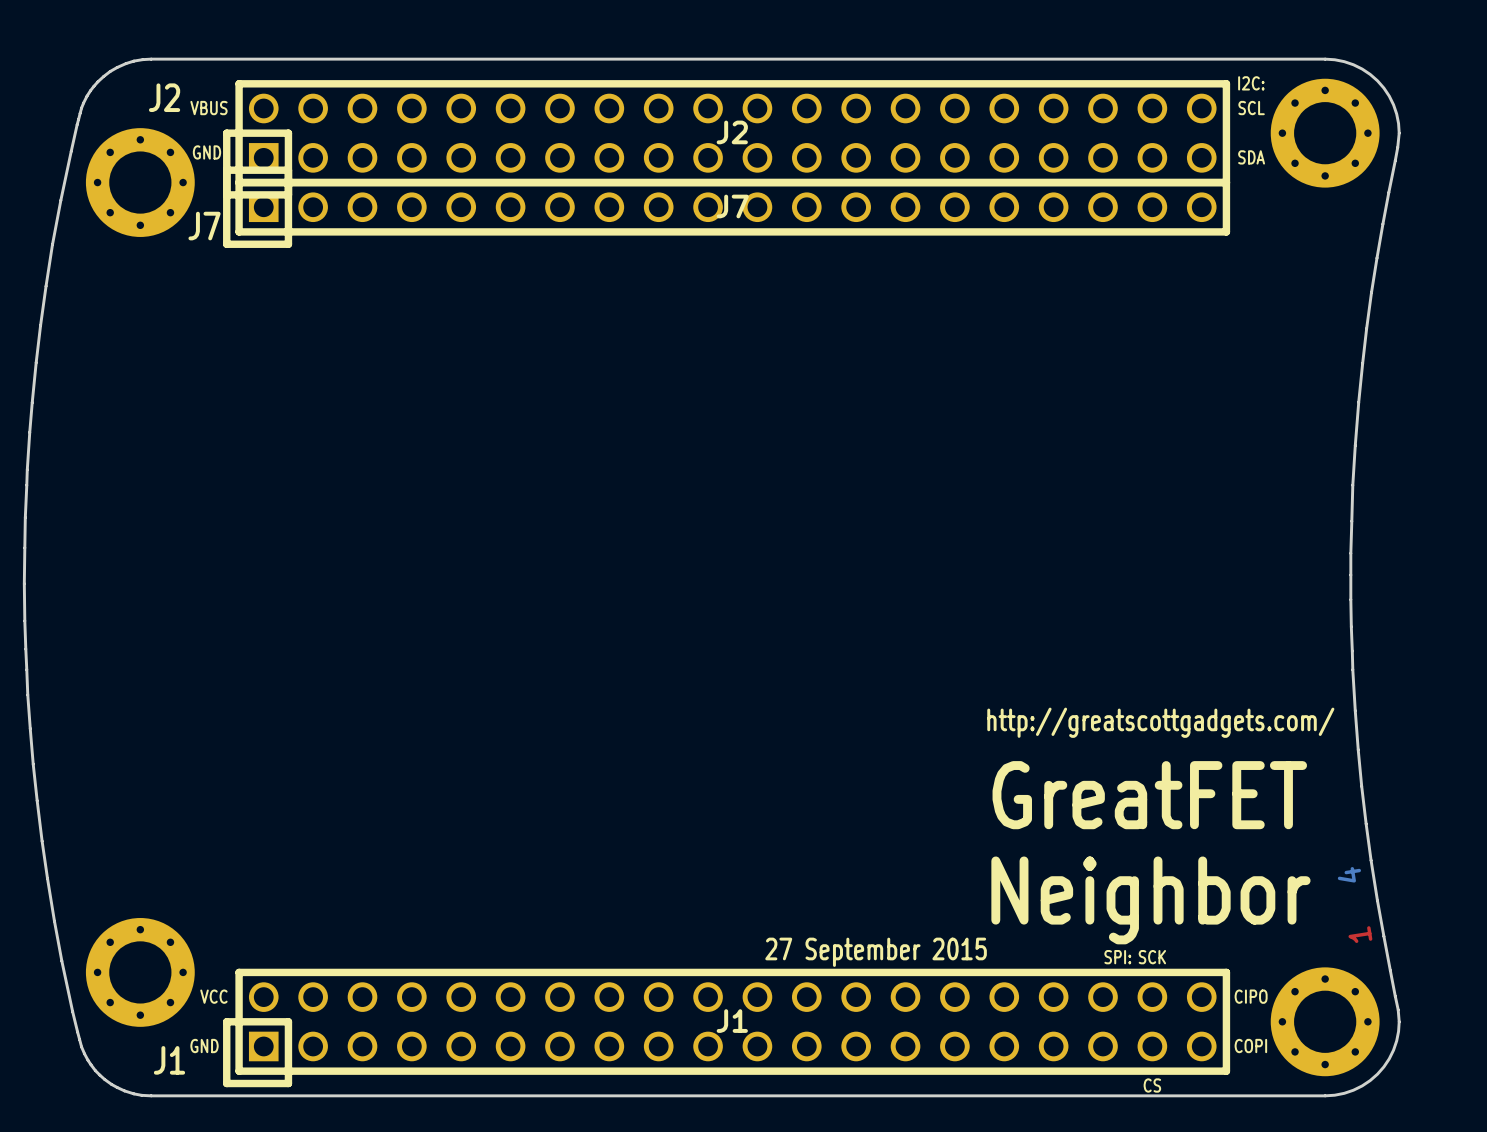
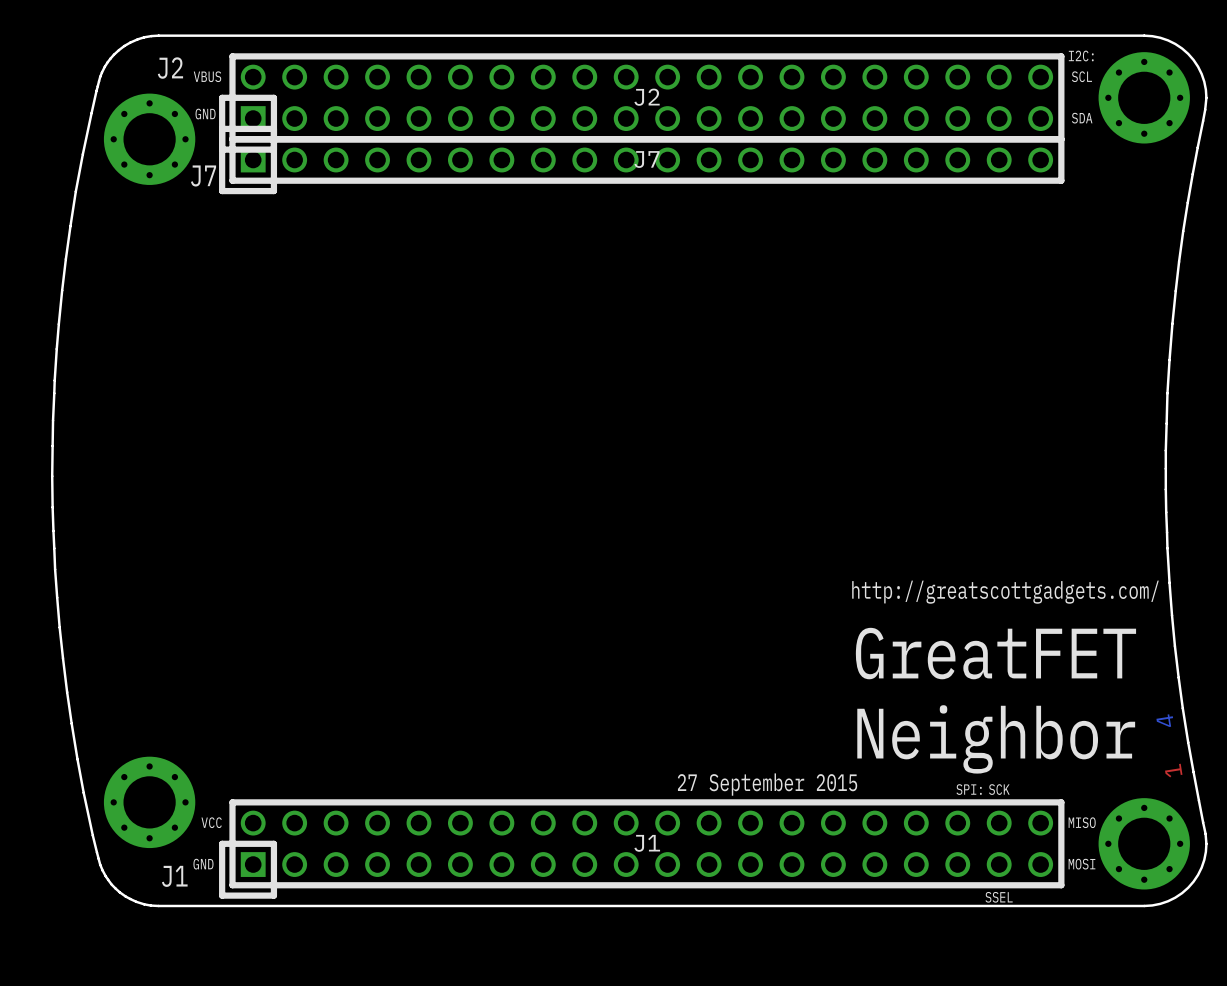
text: CIPO (1251, 996) -> MISO (1082, 822)
text: COPI (1250, 1046) -> MOSI (1081, 864)
text: CS (1152, 1085) -> SSEL (999, 897)

